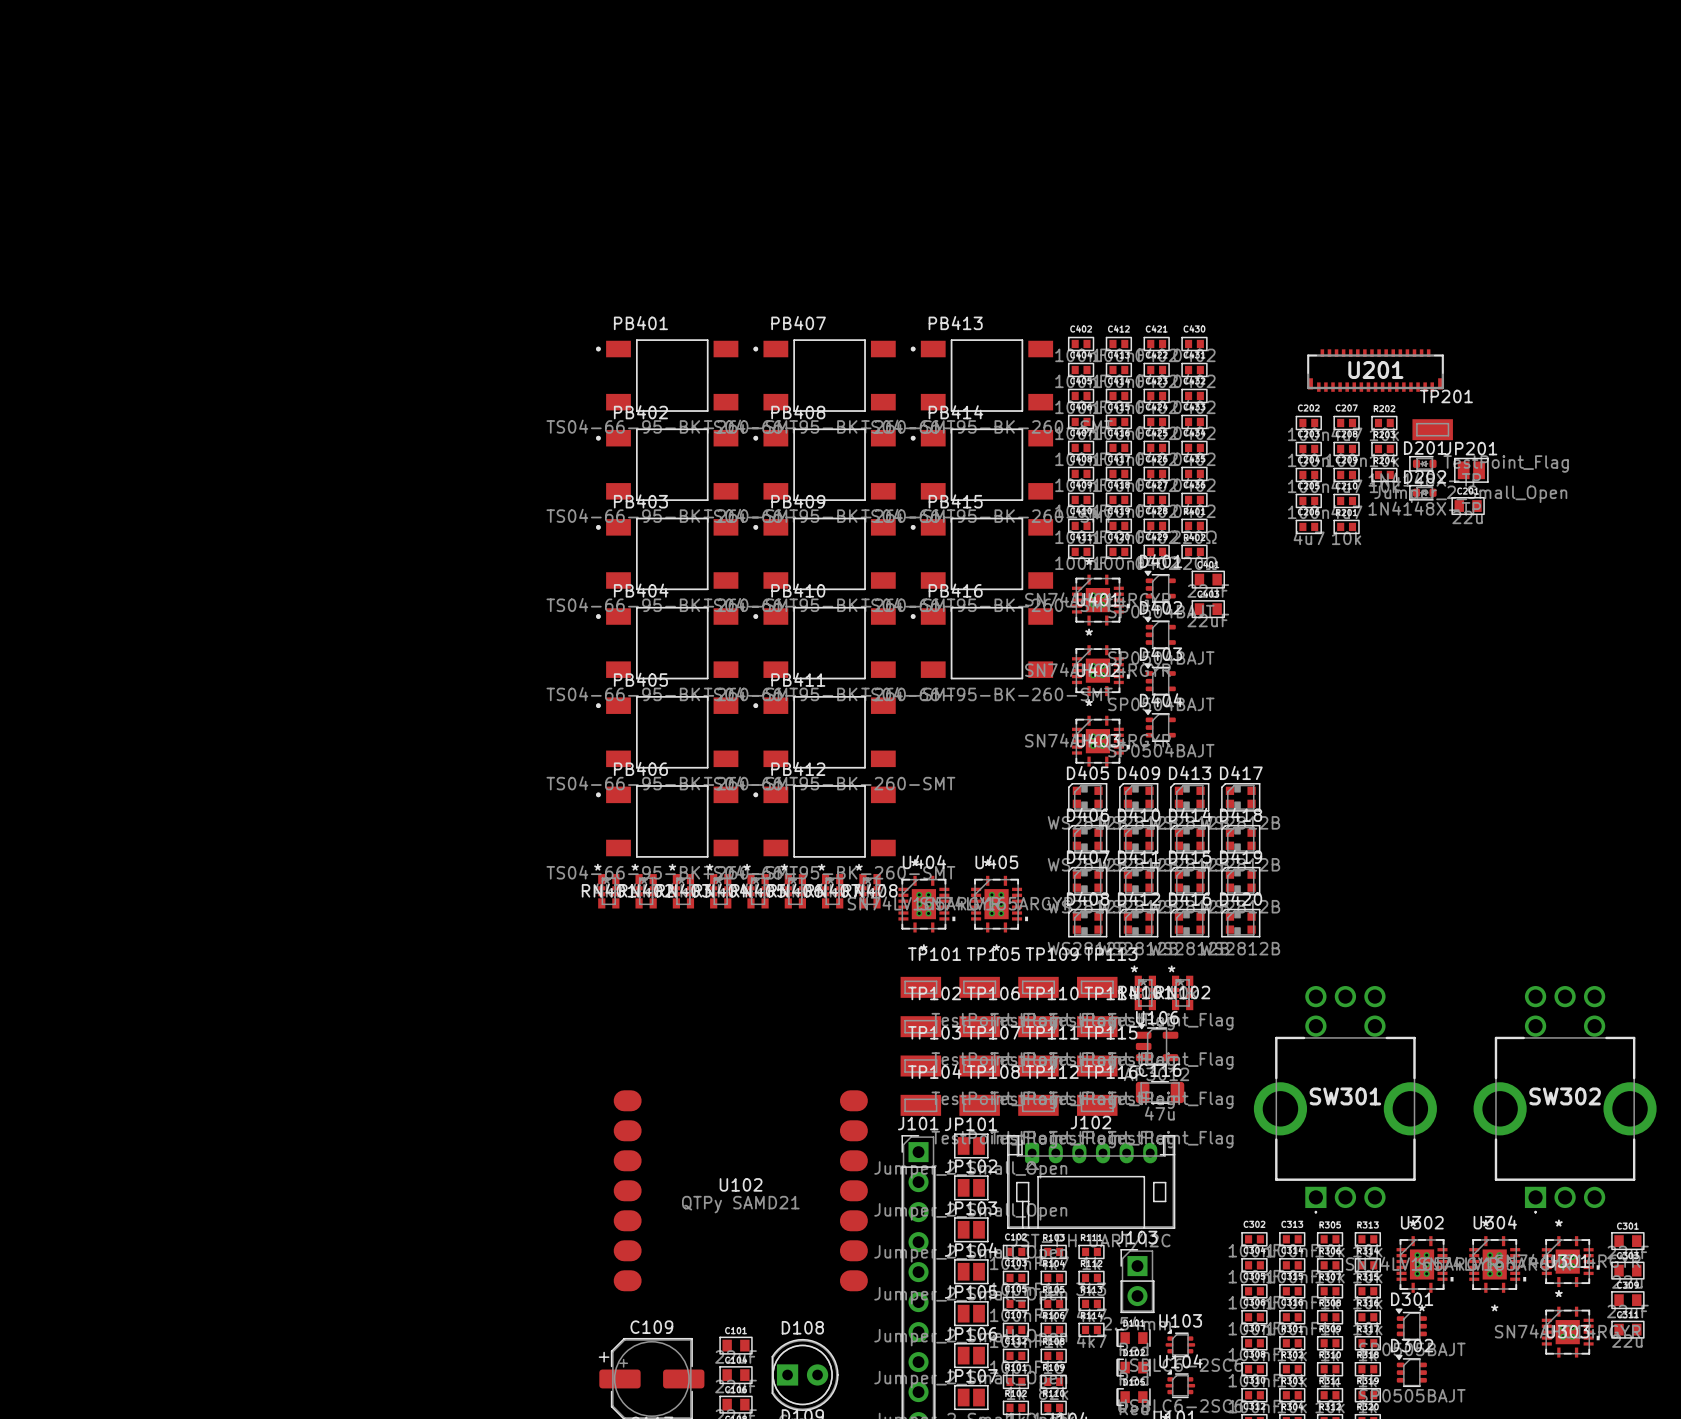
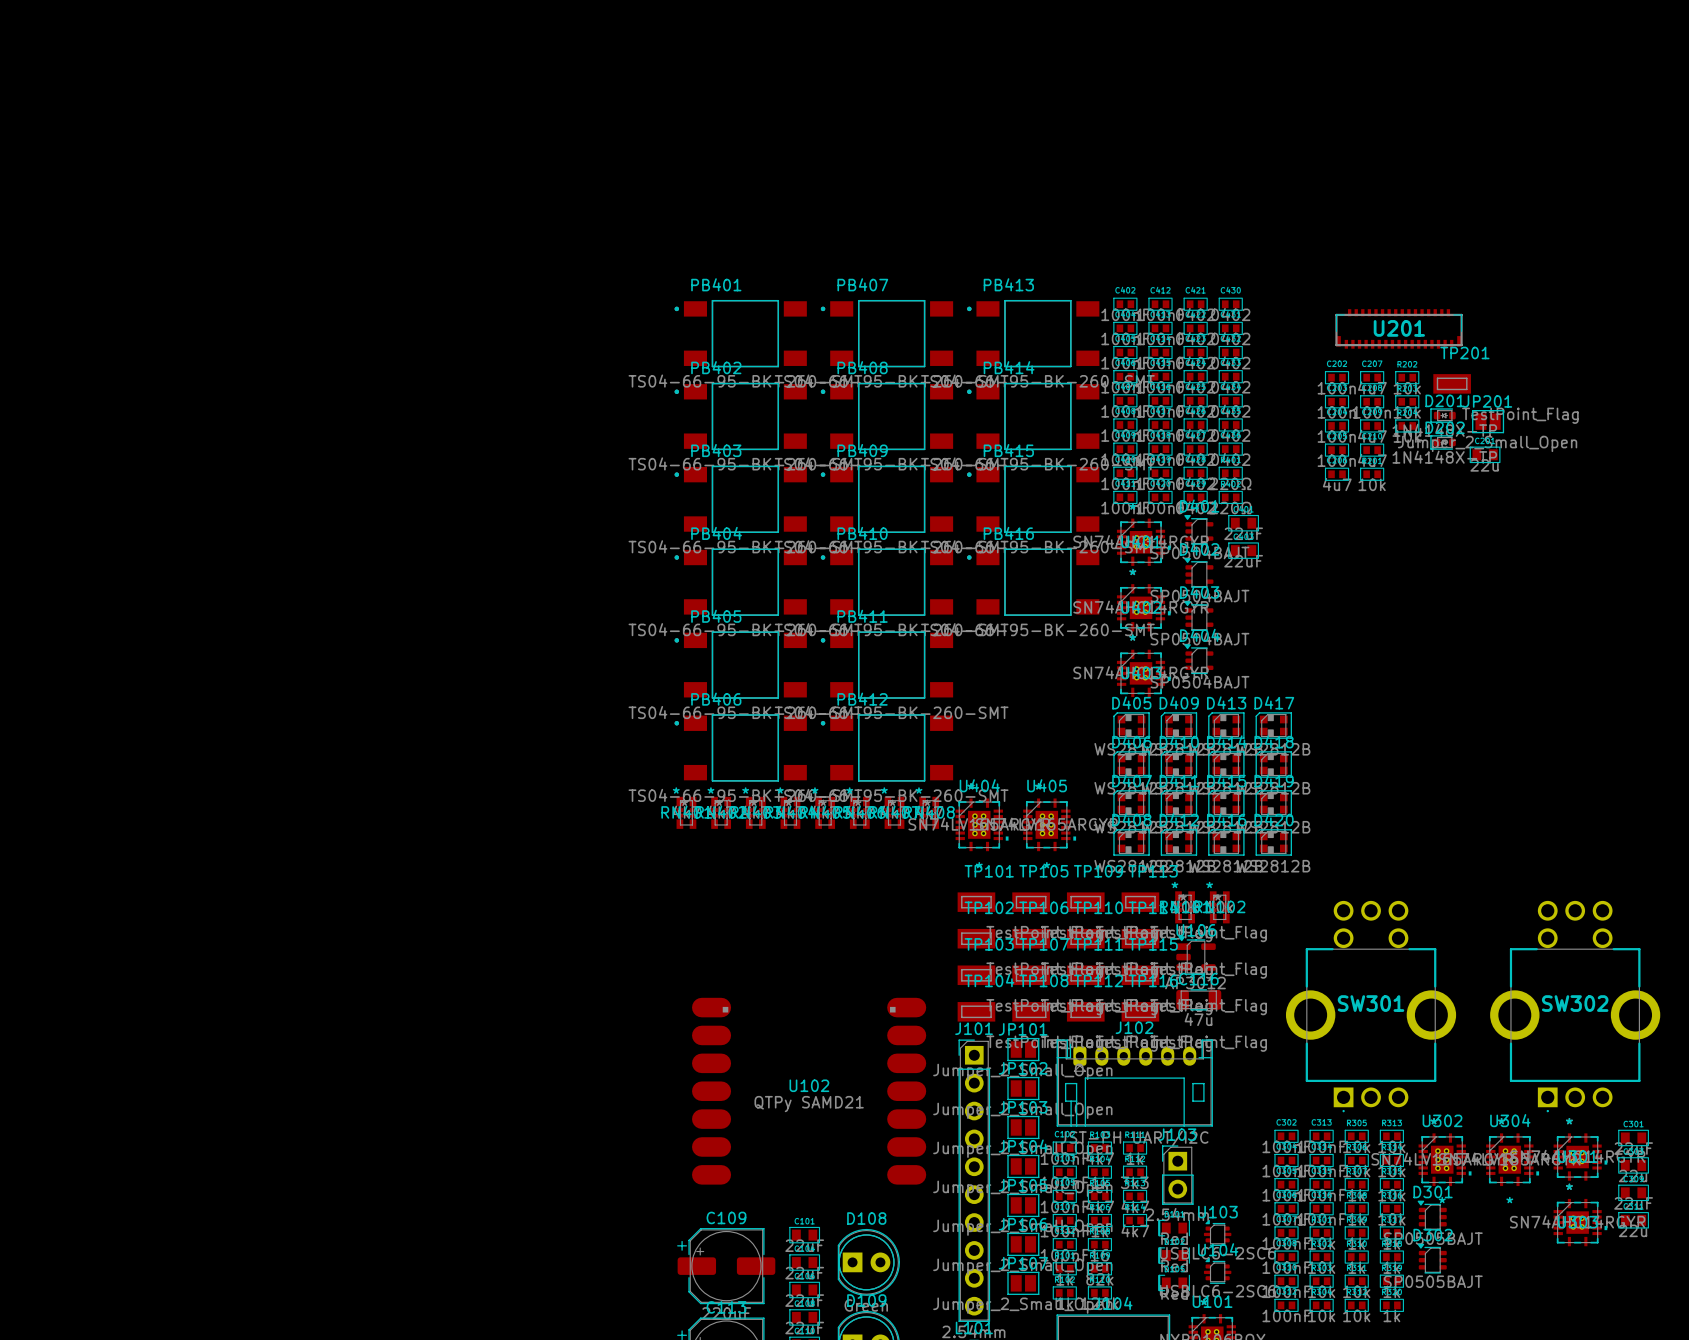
U102 footprint: [613, 1090, 868, 1292] -> [692, 997, 927, 1185]

